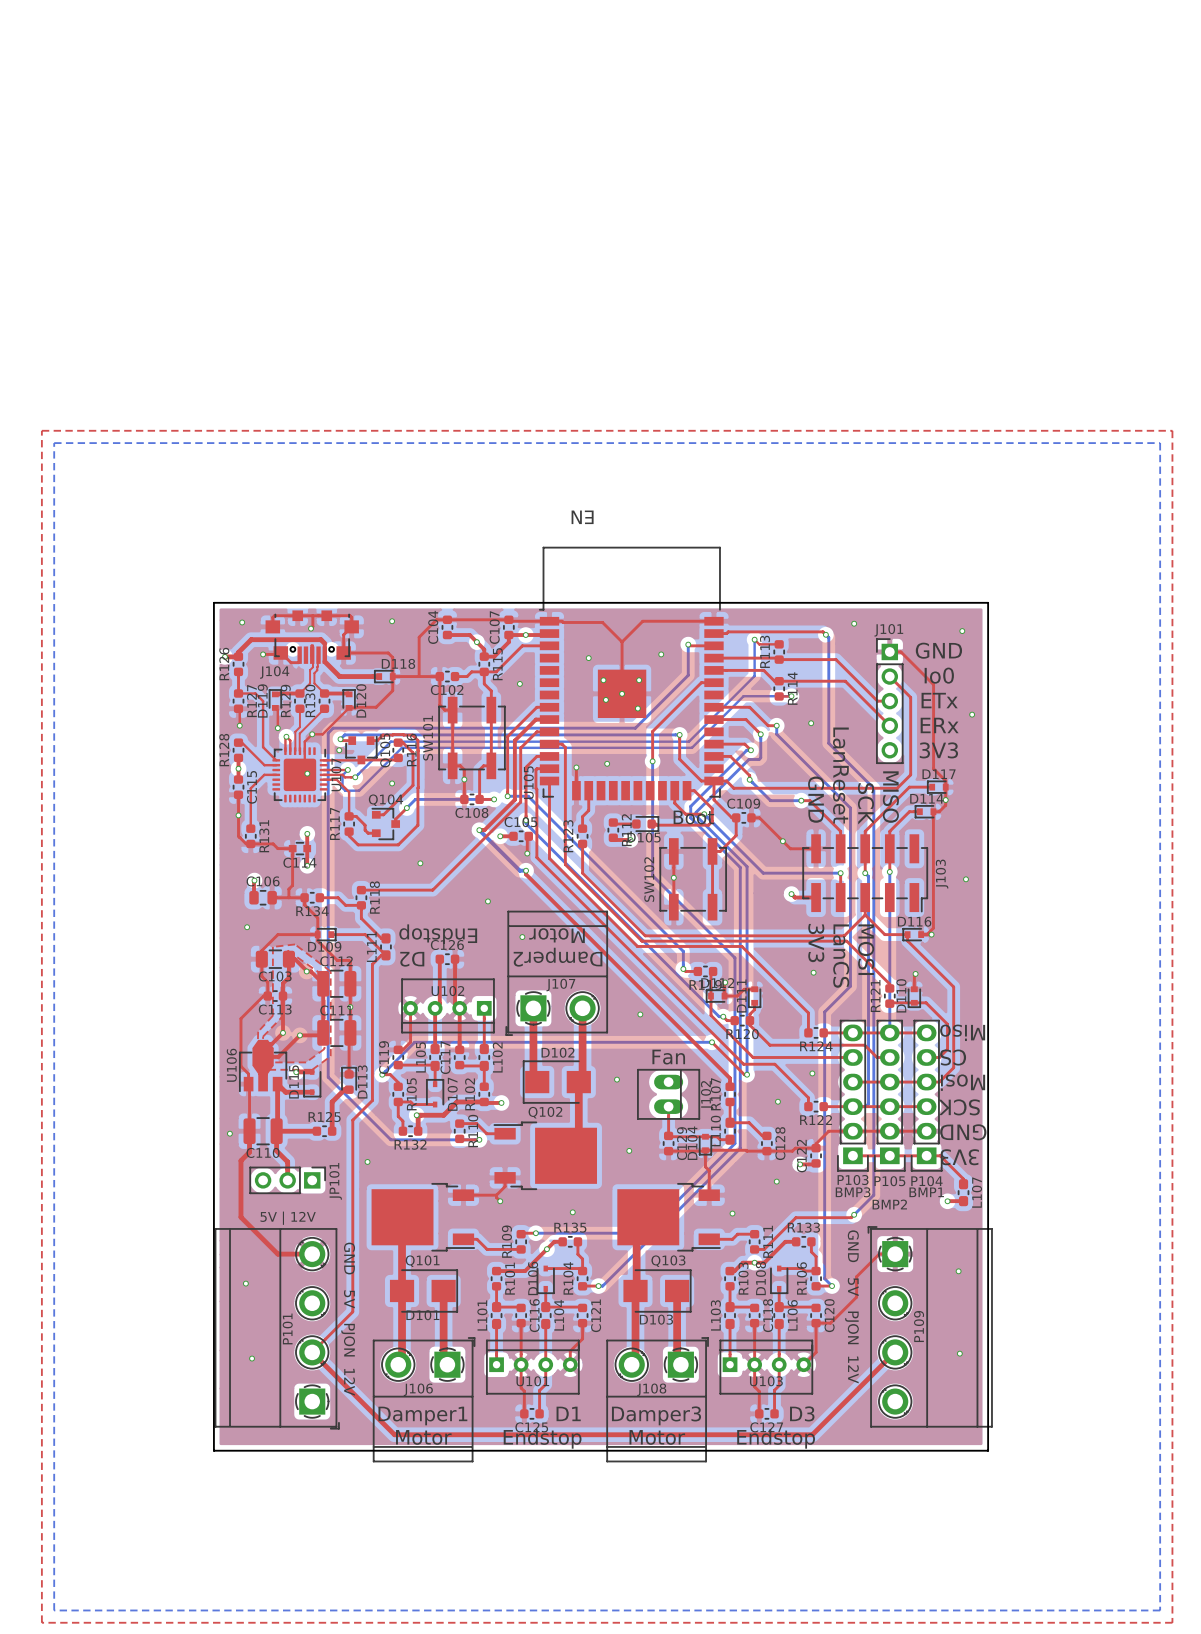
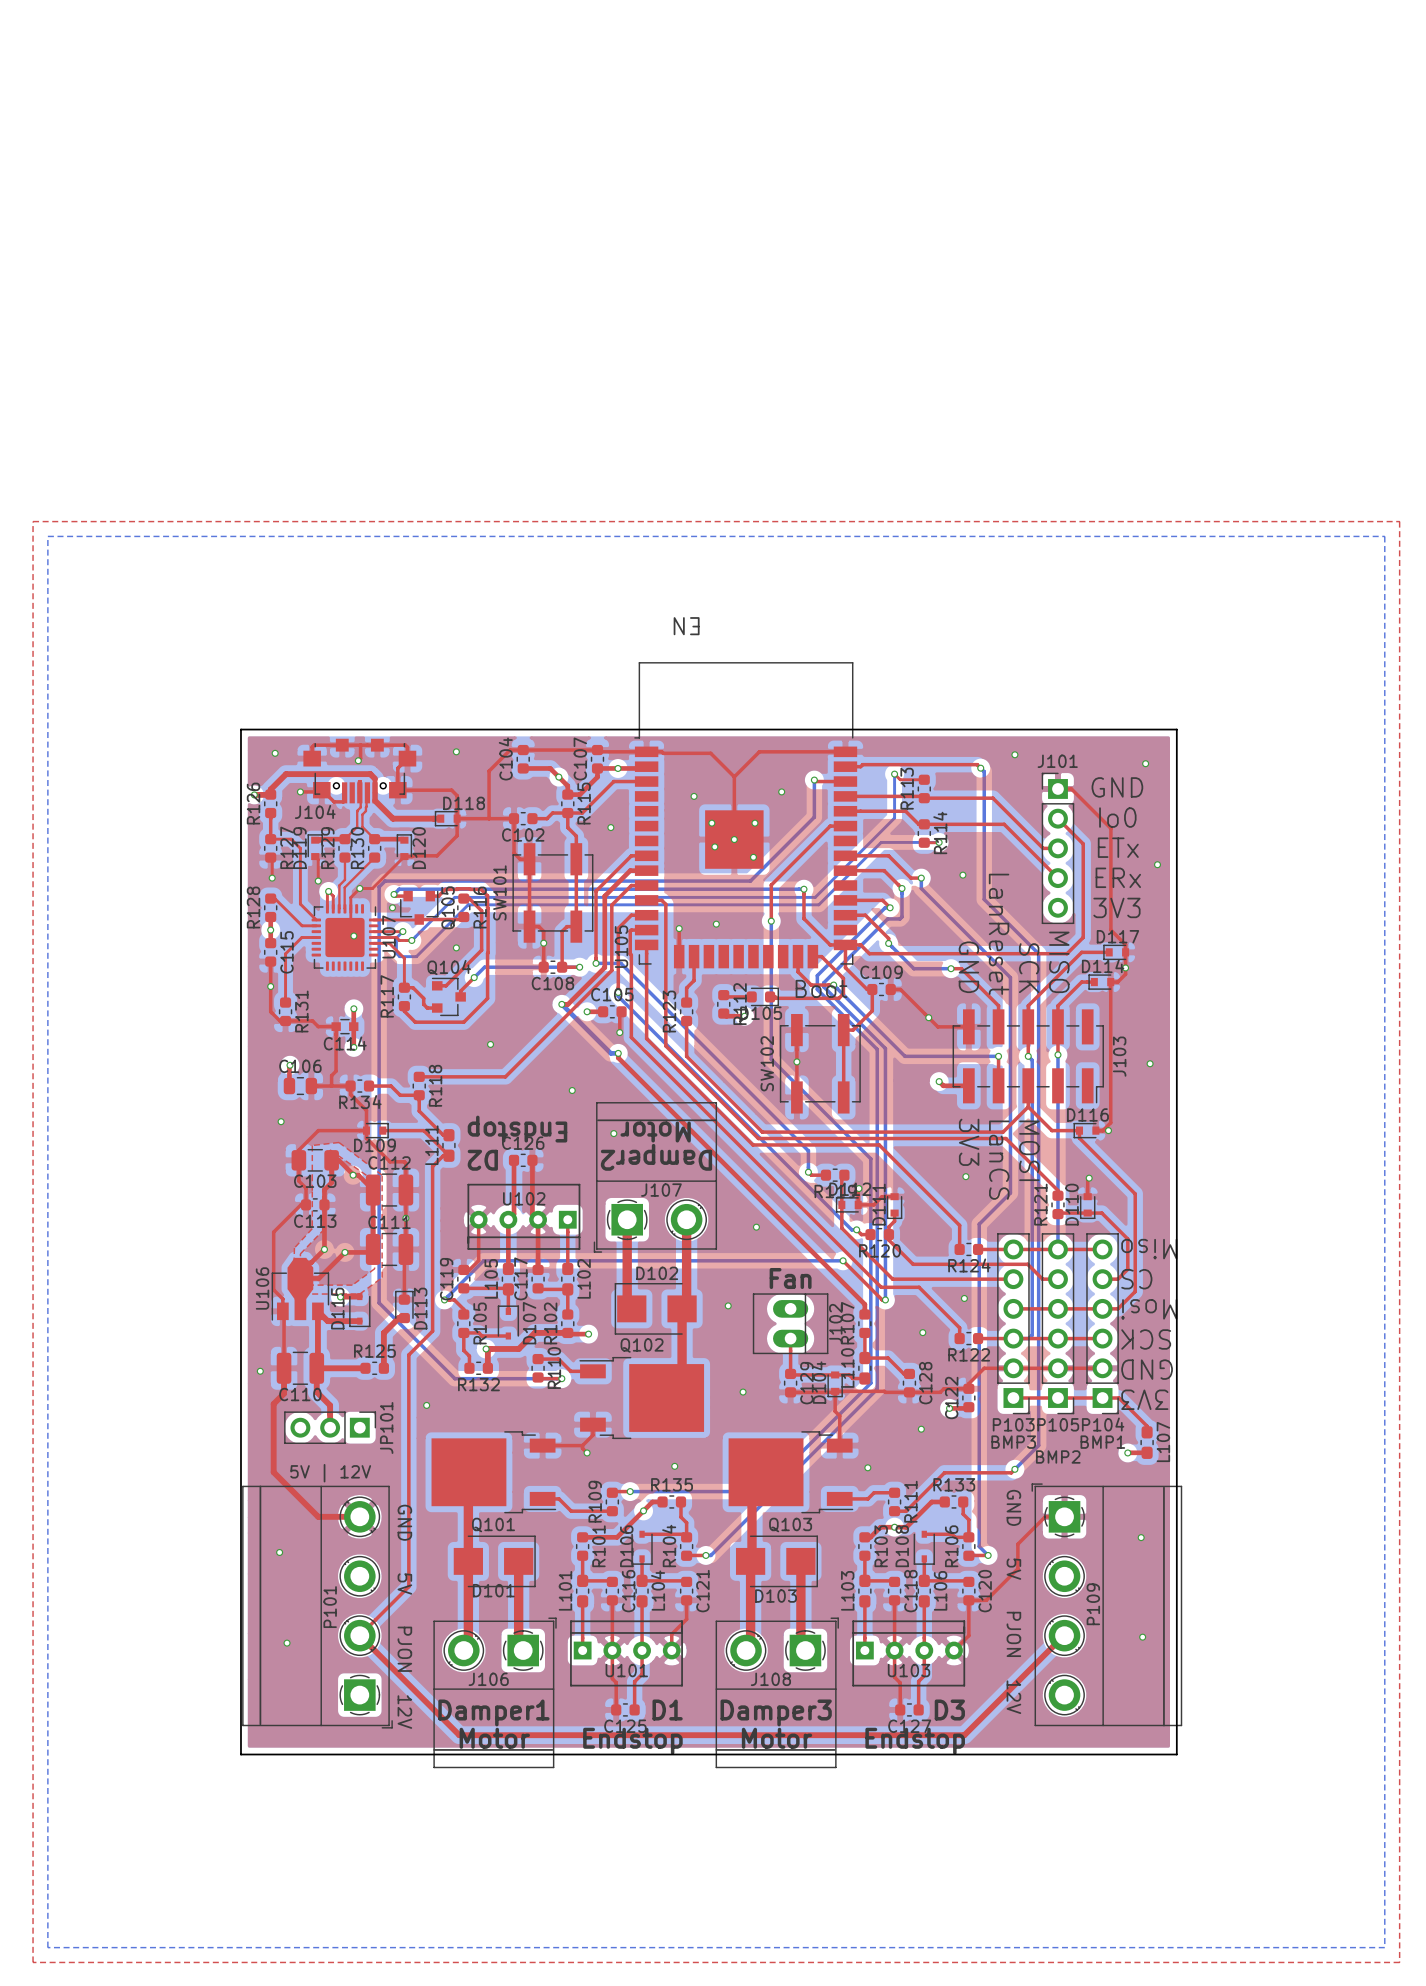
P103 footprint: [837, 1019, 869, 1172] -> [997, 1233, 1030, 1415]
P105 footprint: [874, 1019, 906, 1172] -> [1041, 1233, 1075, 1415]
P104 footprint: [910, 1019, 943, 1172] -> [1086, 1233, 1119, 1415]

